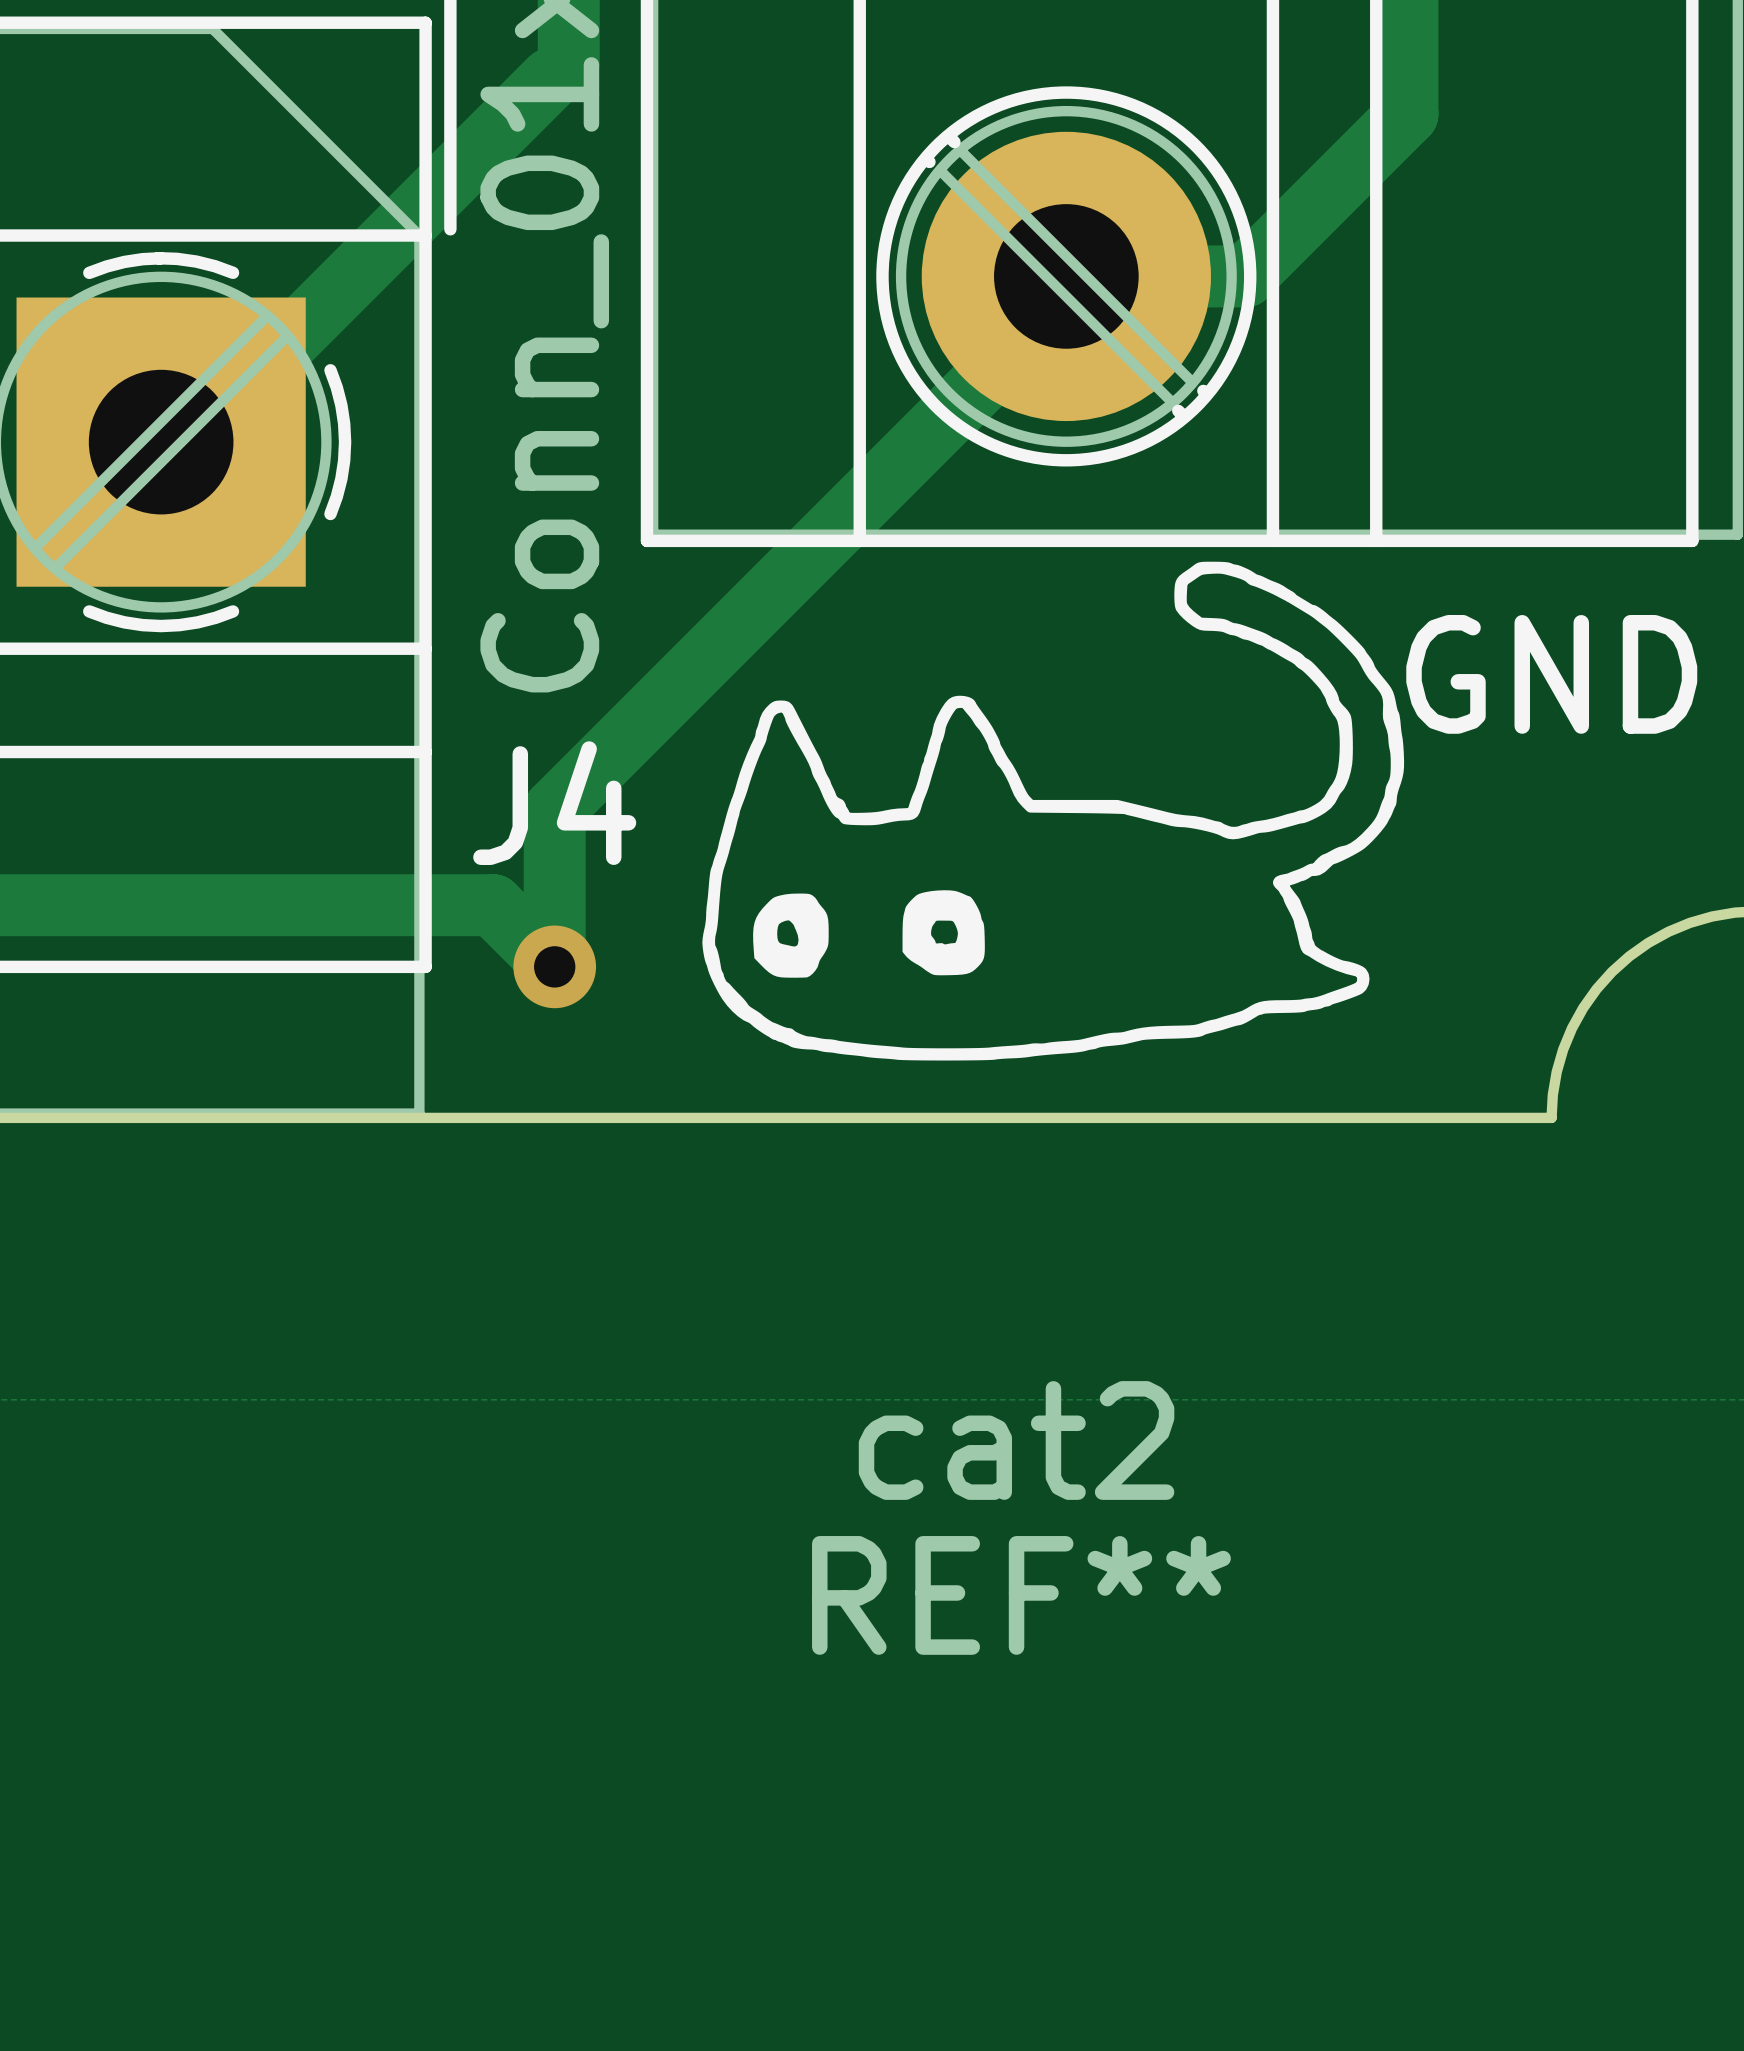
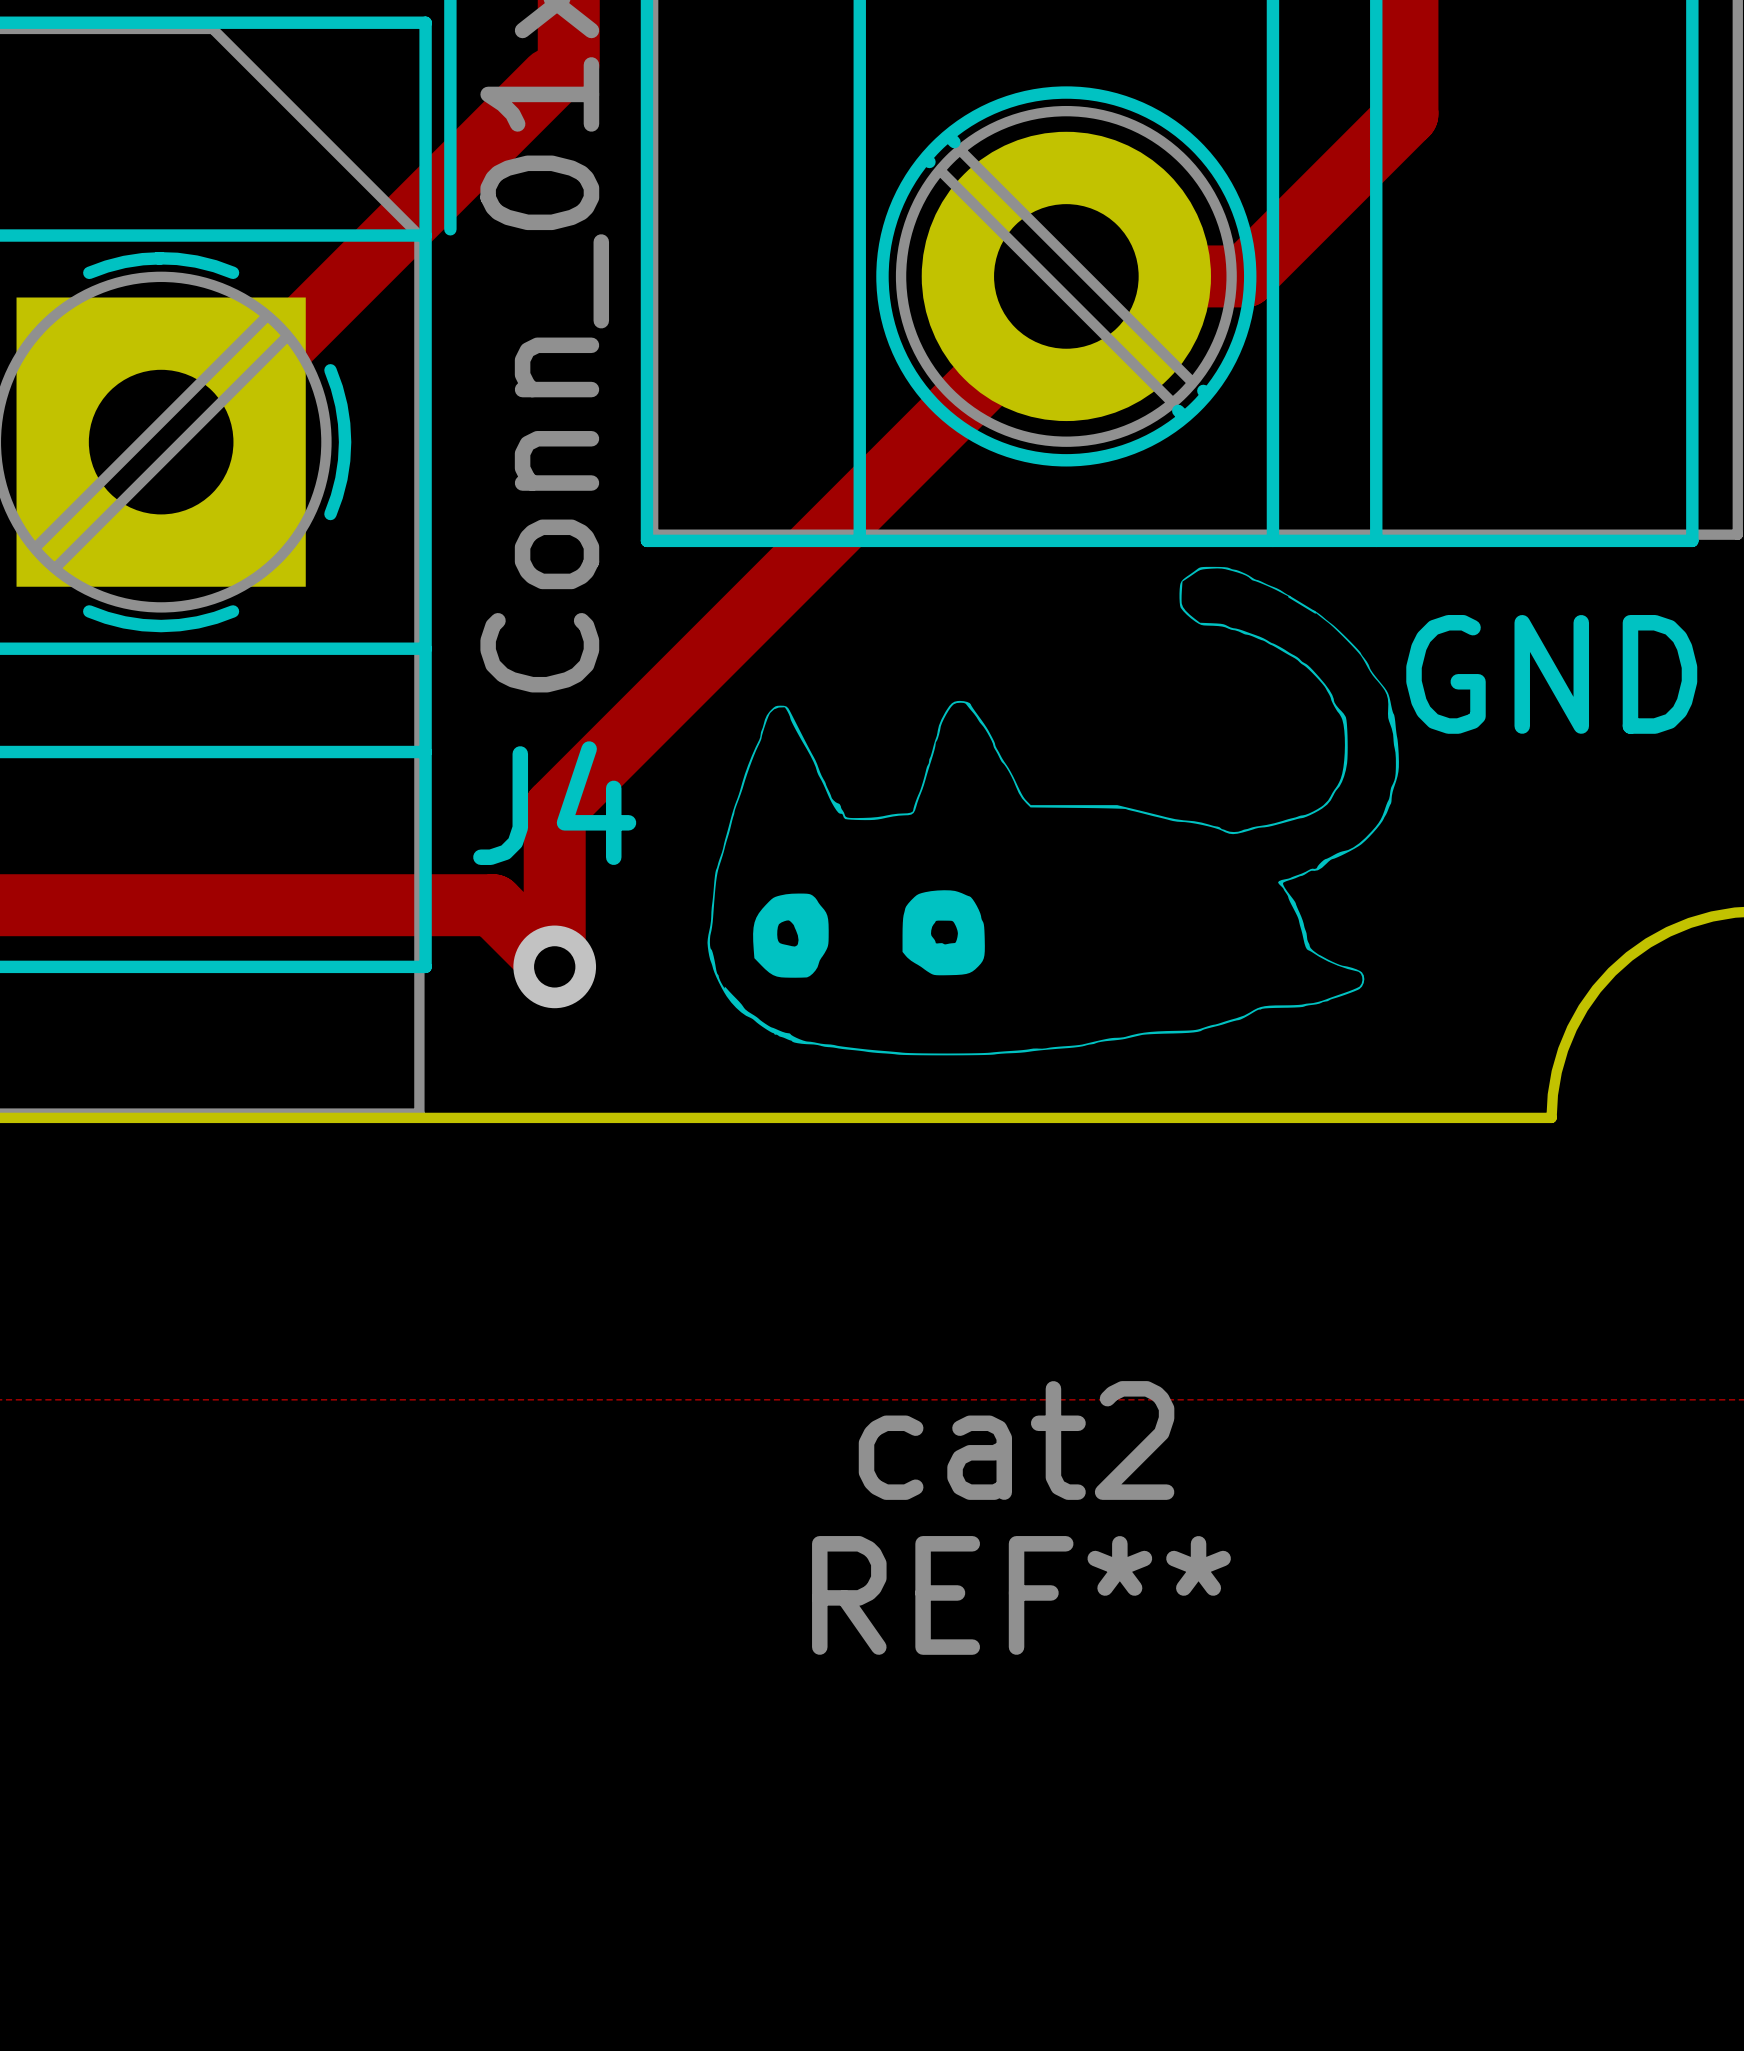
REF** footprint: [702, 561, 1405, 1061] -> [707, 566, 1399, 1056]

